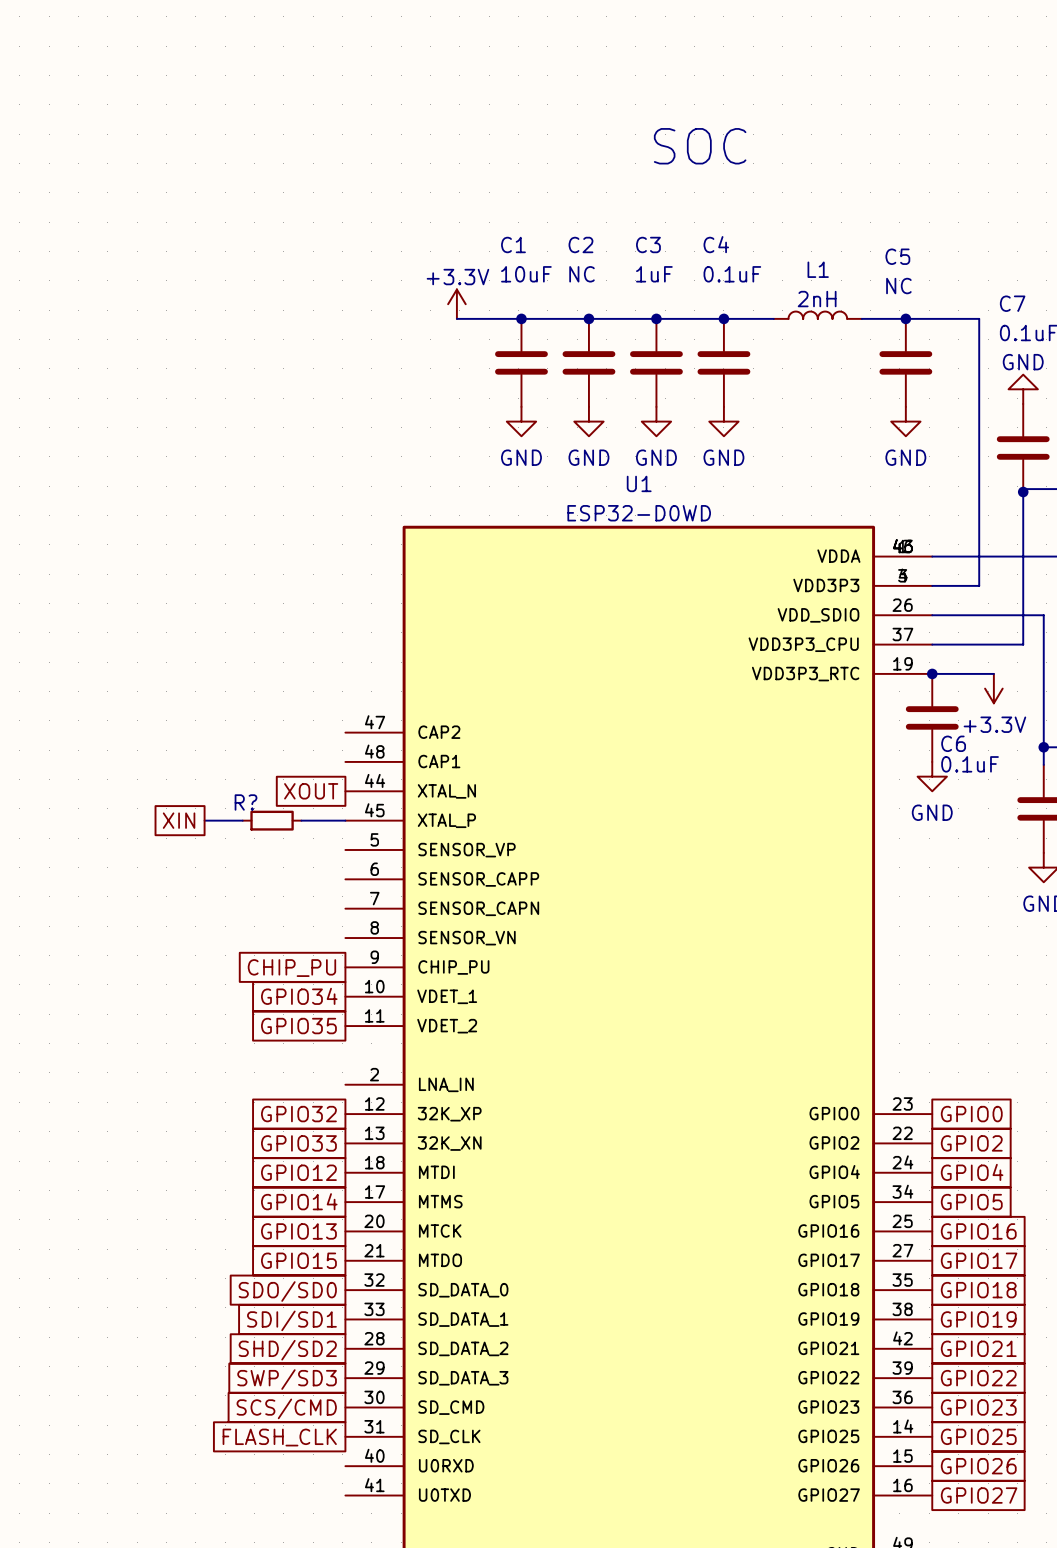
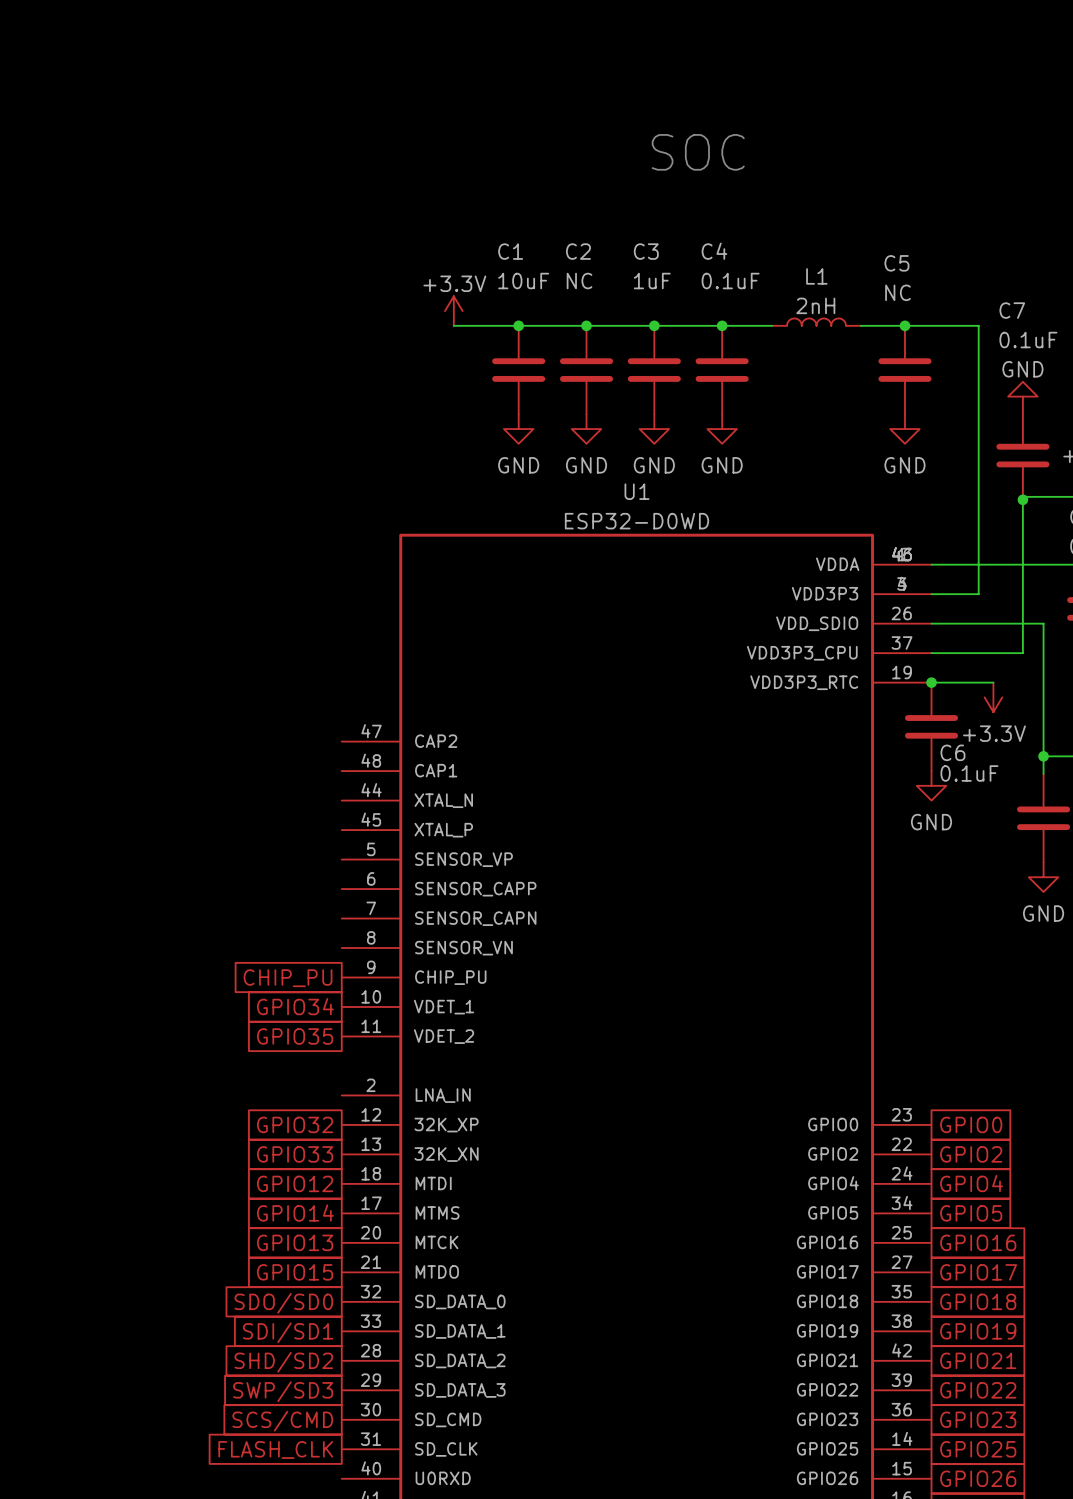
global label: XOUT (311, 791) -> none
global label: XIN (179, 820) -> none
wire: (204, 820) (242, 820) -> none
R?: (272, 820) -> none
wire: (301, 820) (345, 820) -> none

